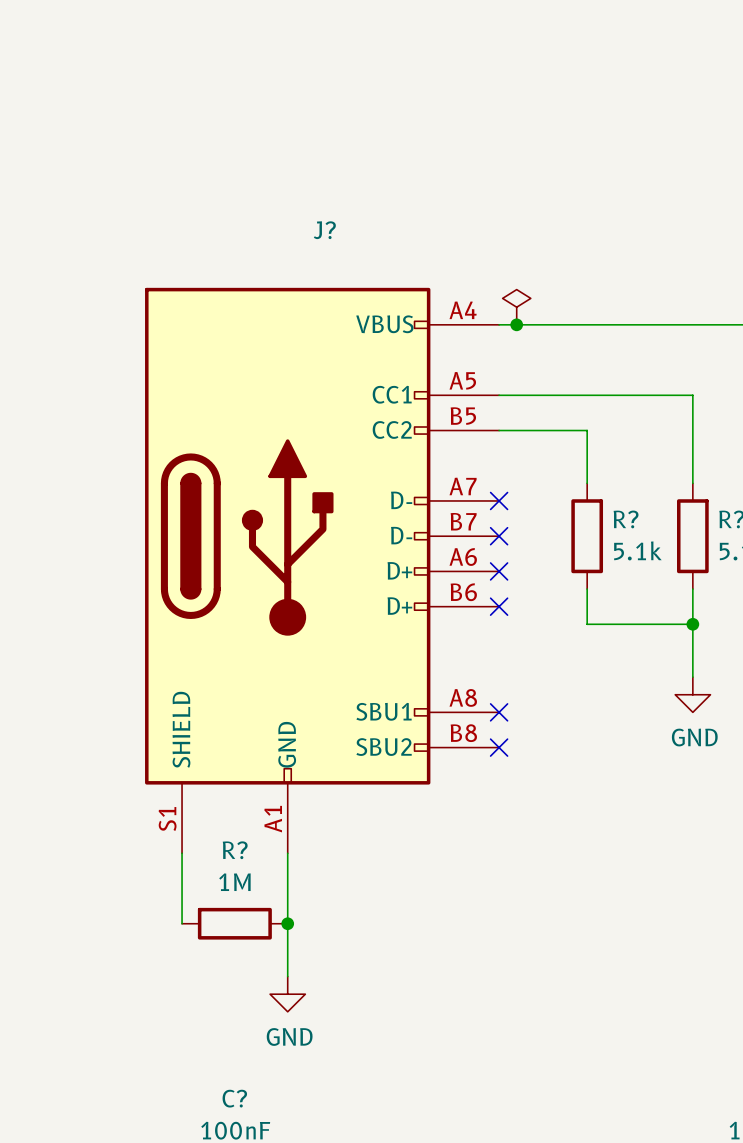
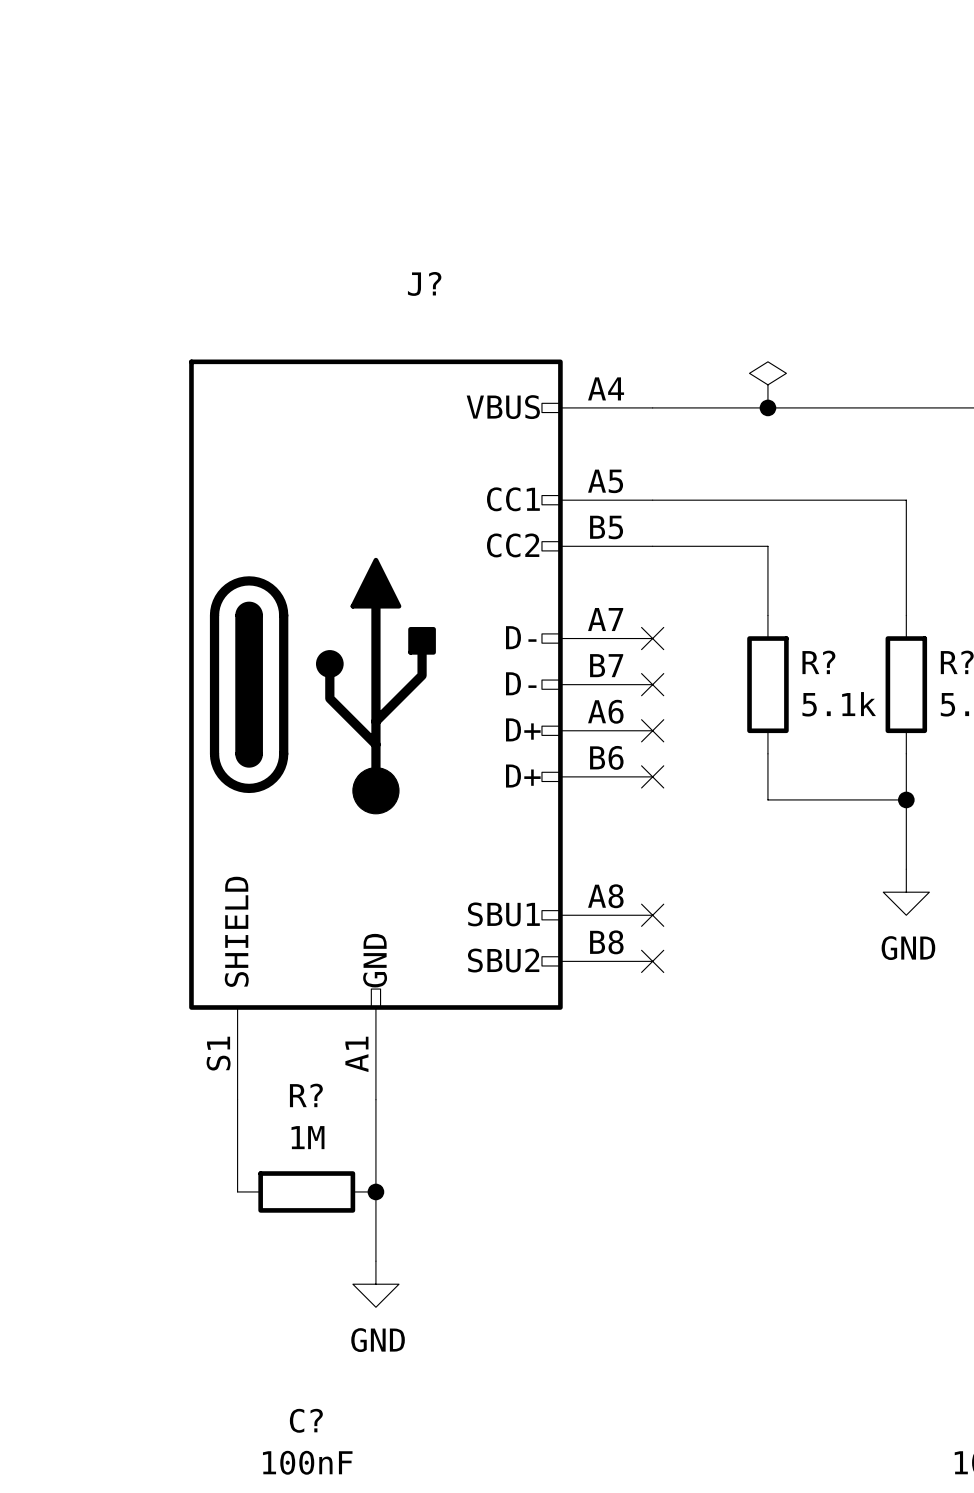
power symbol position: (516, 307) -> (767, 384)
junction position: (516, 324) -> (767, 407)

